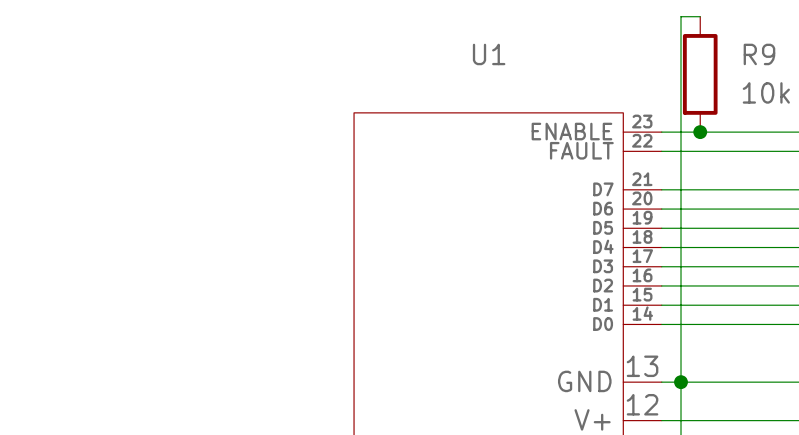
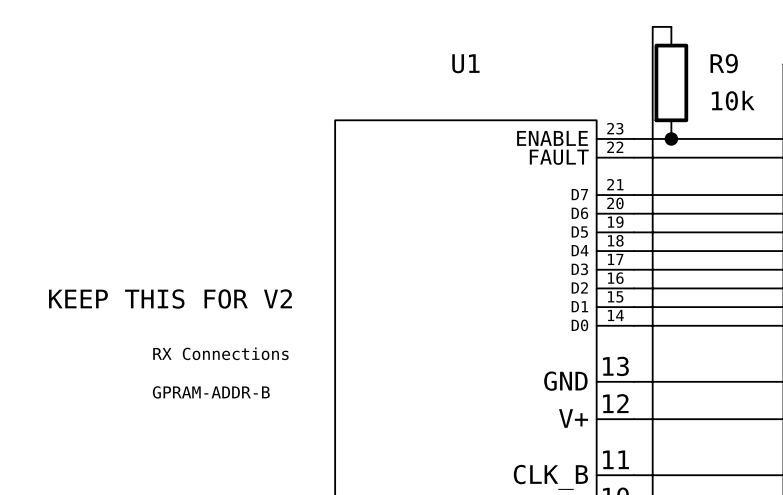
text: none -> KEEP THIS FOR V2 (170, 299)
text: none -> RX Connections (220, 353)
junction: (681, 382) -> none
text: none -> GPRAM-ADDR-B (211, 392)

